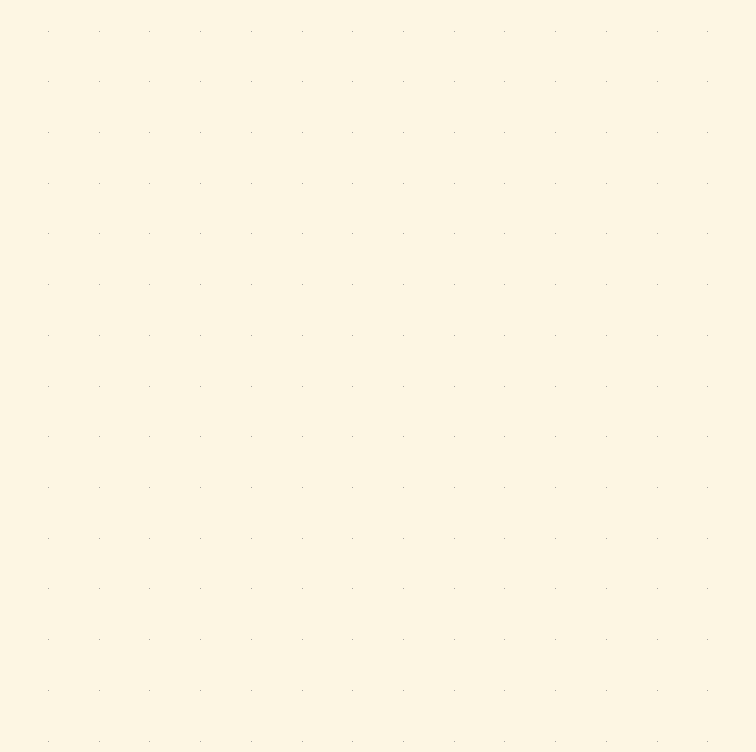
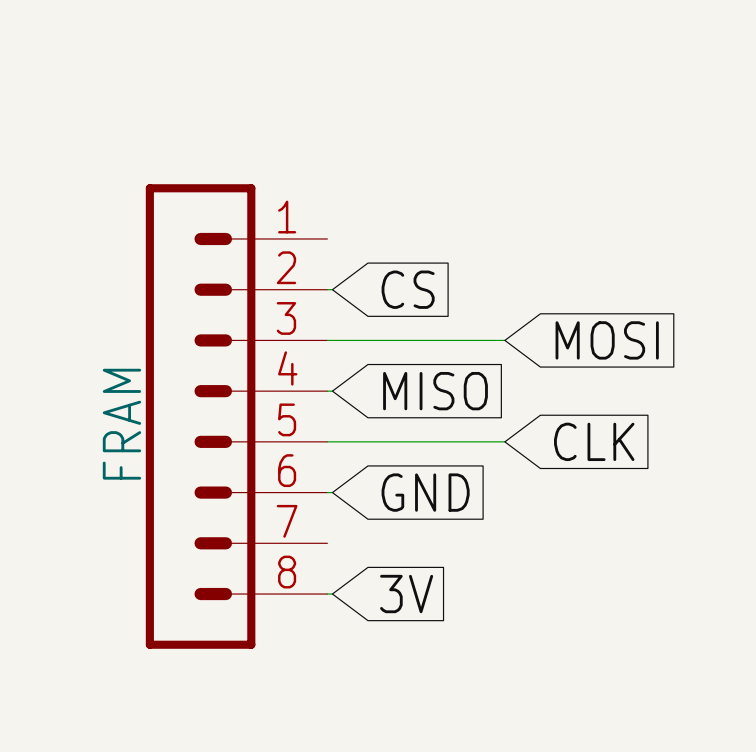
wire: none -> (327, 289) (332, 289)
global label: none -> CS (408, 289)
wire: none -> (327, 340) (504, 340)
global label: none -> MOSI (607, 340)
wire: none -> (327, 391) (332, 391)
global label: none -> MISO (435, 391)
FRAM: none -> (236, 416)
wire: none -> (327, 441) (504, 441)
global label: none -> CLK (594, 441)
wire: none -> (327, 492) (332, 492)
global label: none -> GND (425, 492)
wire: none -> (327, 594) (332, 594)
global label: none -> 3V (406, 594)

